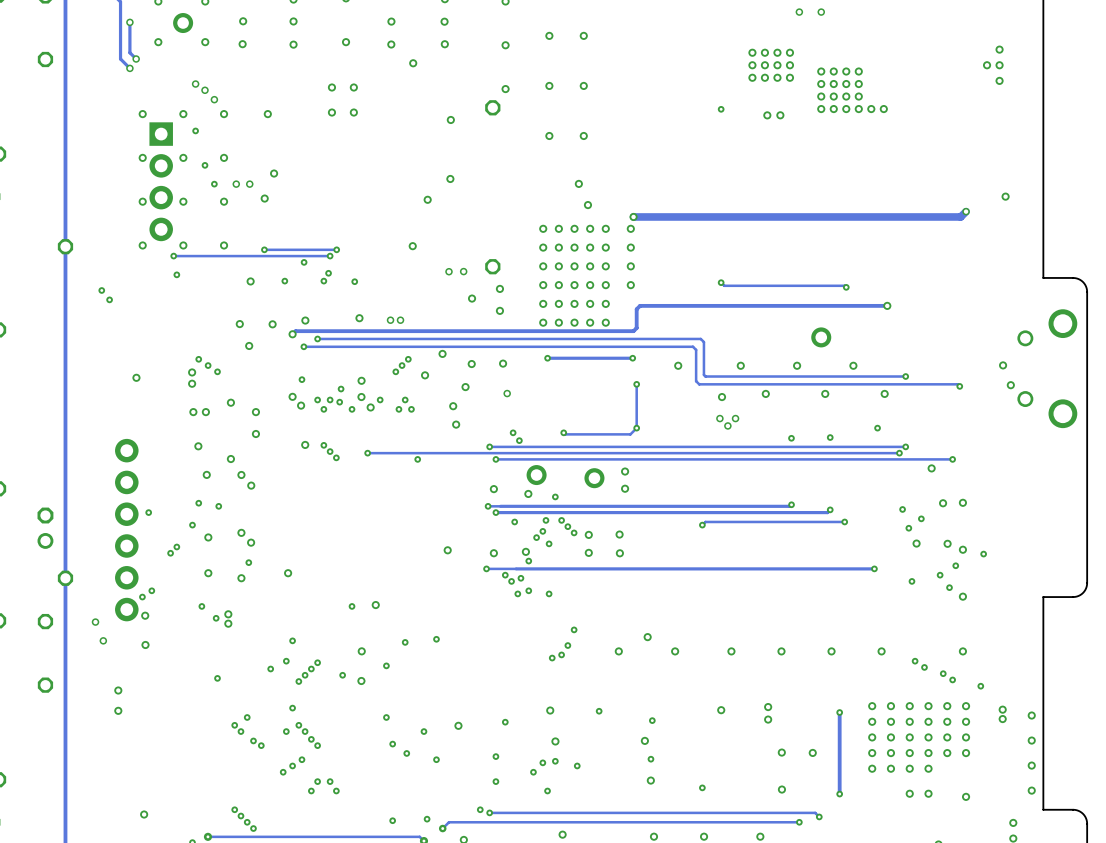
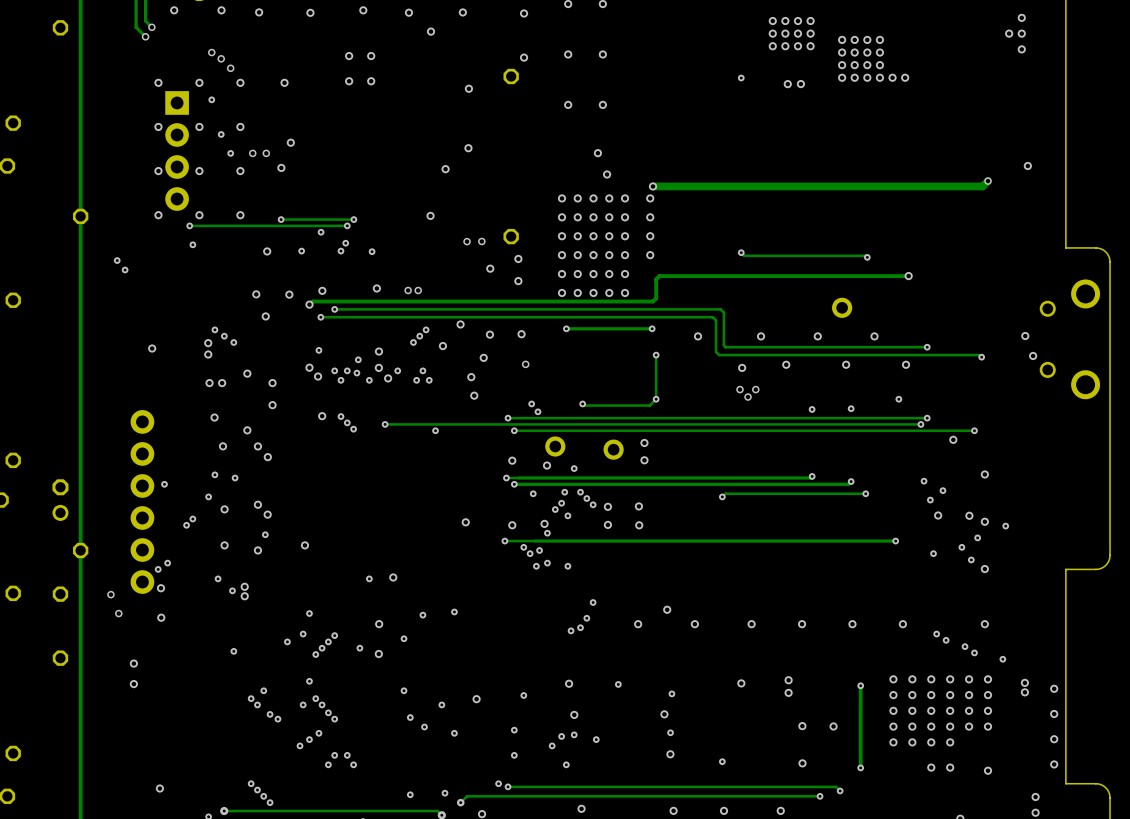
via: (943, 503) -> none

